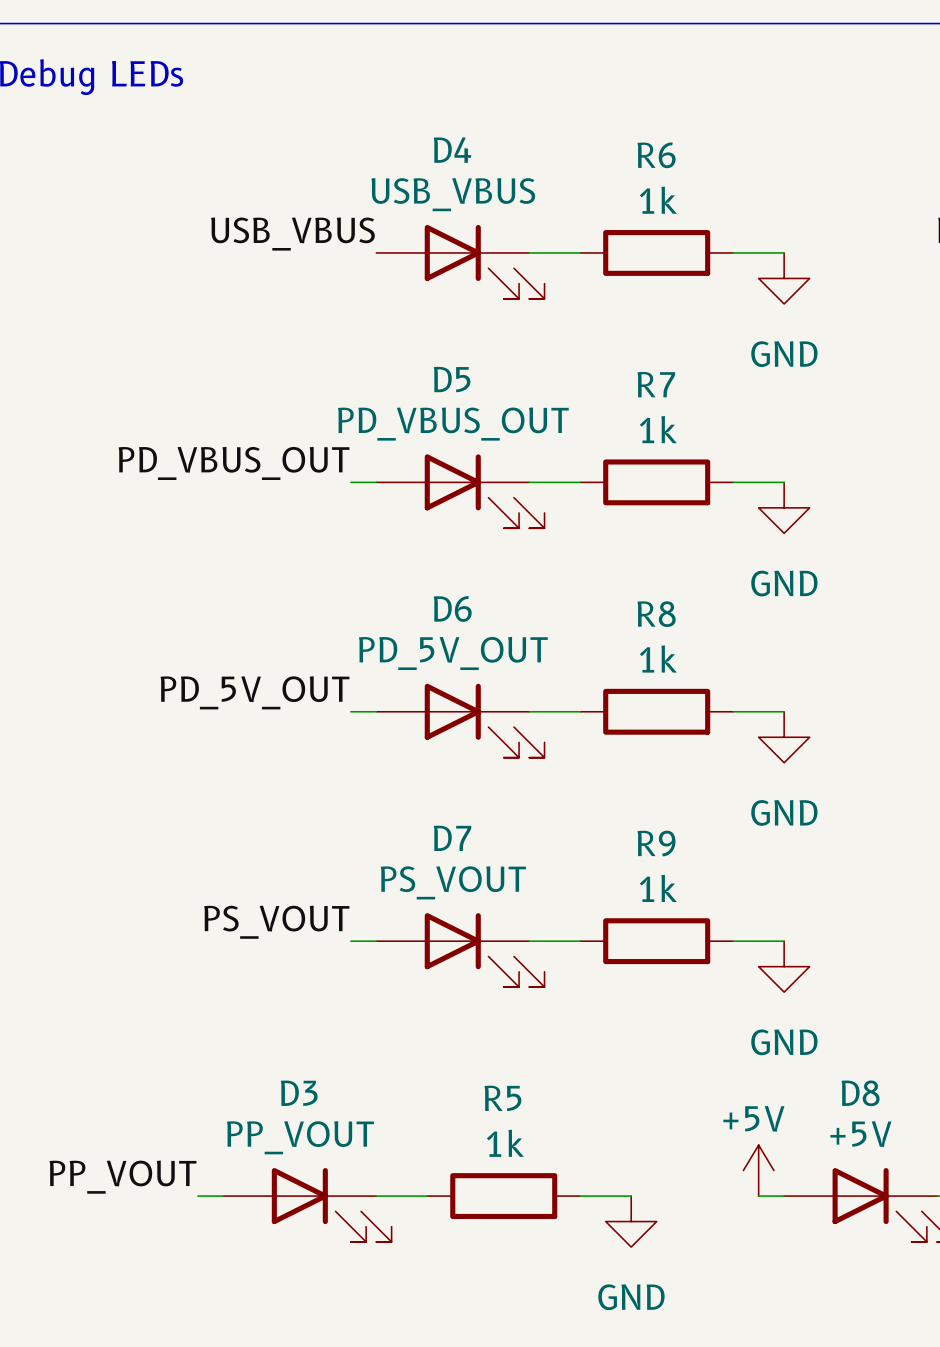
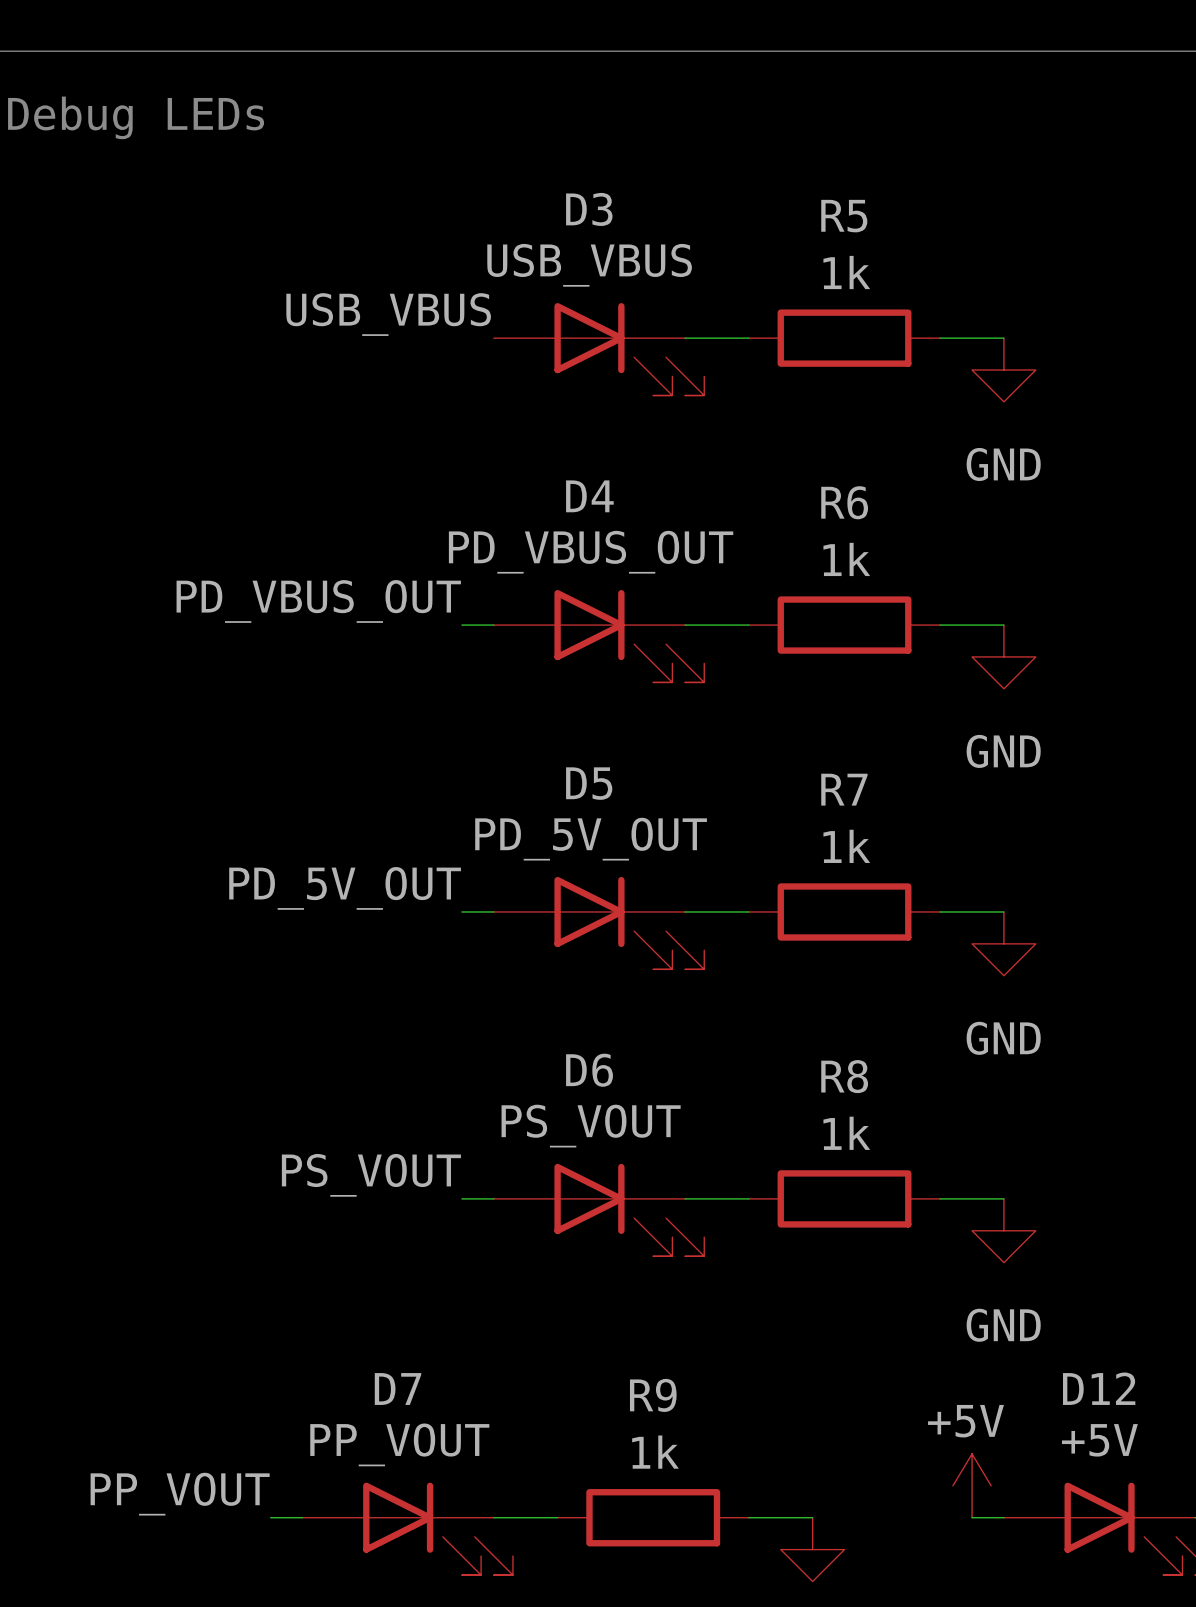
D4 name: D4 (452, 150) -> D3 (589, 209)
R6 name: R6 (656, 155) -> R5 (844, 216)
D5 name: D5 (452, 379) -> D4 (589, 496)
R7 name: R7 (656, 384) -> R6 (844, 502)
D6 name: D6 (452, 609) -> D5 (589, 783)
R8 name: R8 (656, 614) -> R7 (844, 789)
D7 name: D7 (452, 838) -> D6 (589, 1070)
R9 name: R9 (656, 843) -> R8 (844, 1076)
D3 name: D3 (299, 1093) -> D7 (398, 1389)
D8 name: D8 (860, 1093) -> D12 (1099, 1388)
R5 name: R5 (502, 1098) -> R9 (653, 1395)

